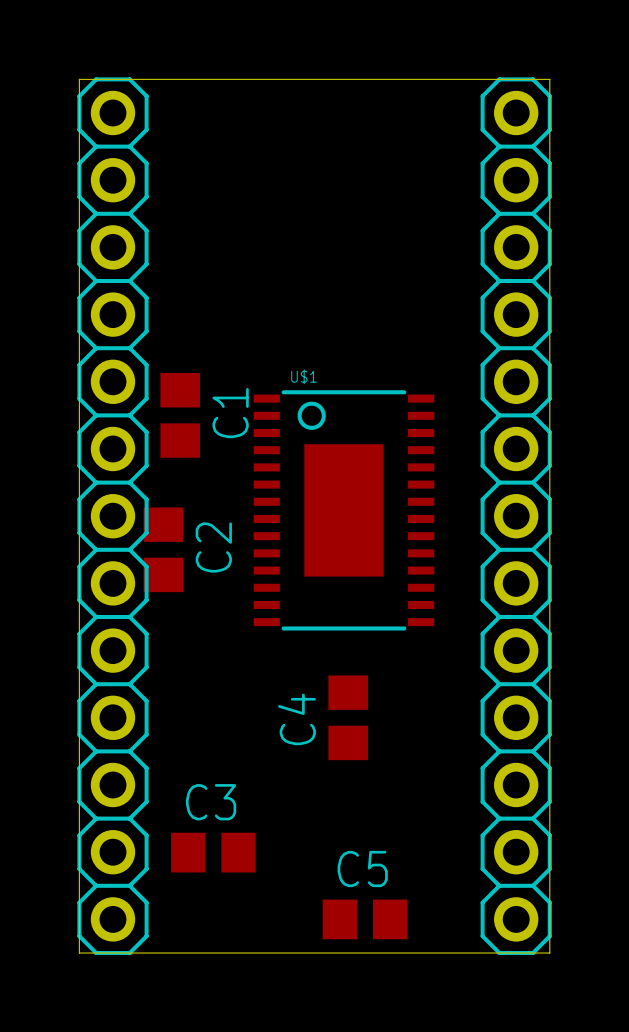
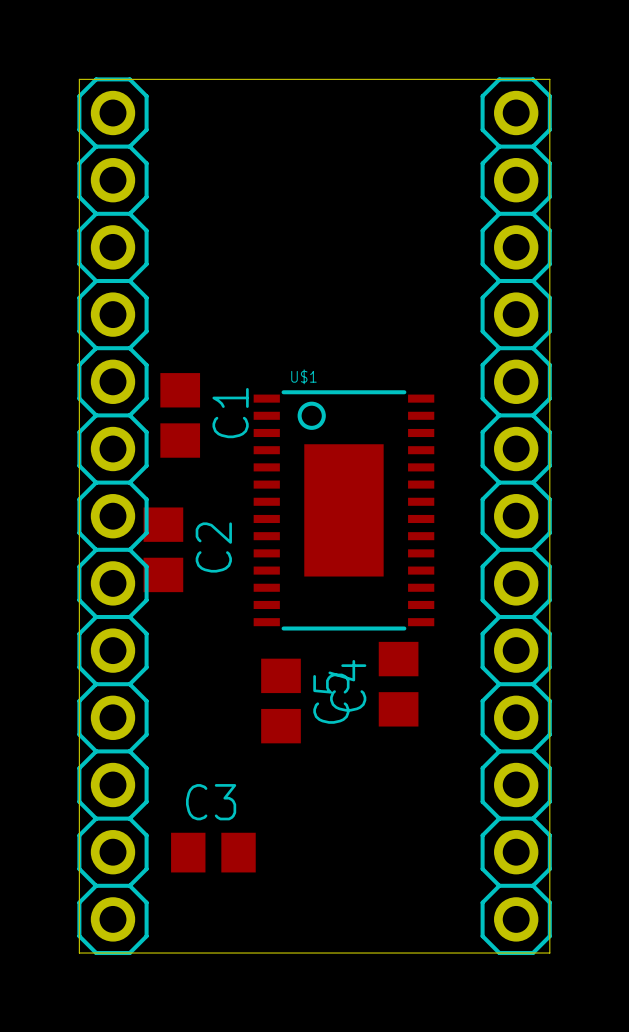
C4 position: (348, 717) -> (398, 684)
C5 rotation: 0° (365, 919) -> 90° clockwise (281, 701)
C5 position: (365, 919) -> (281, 701)

